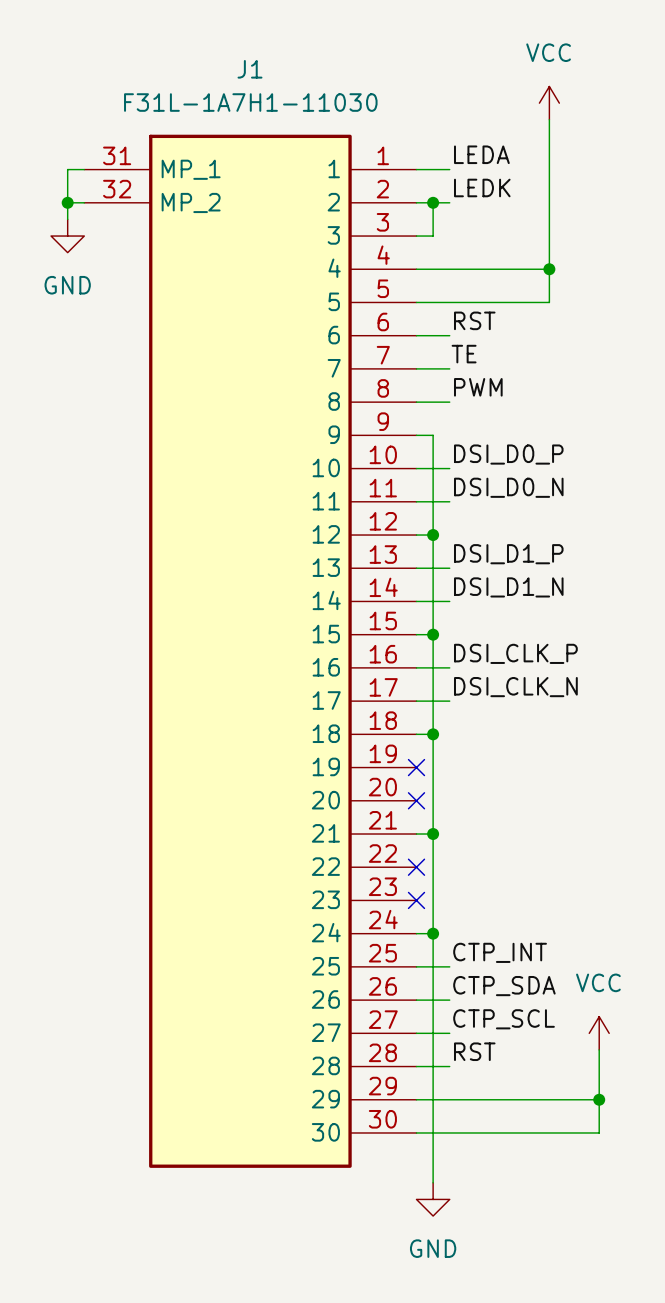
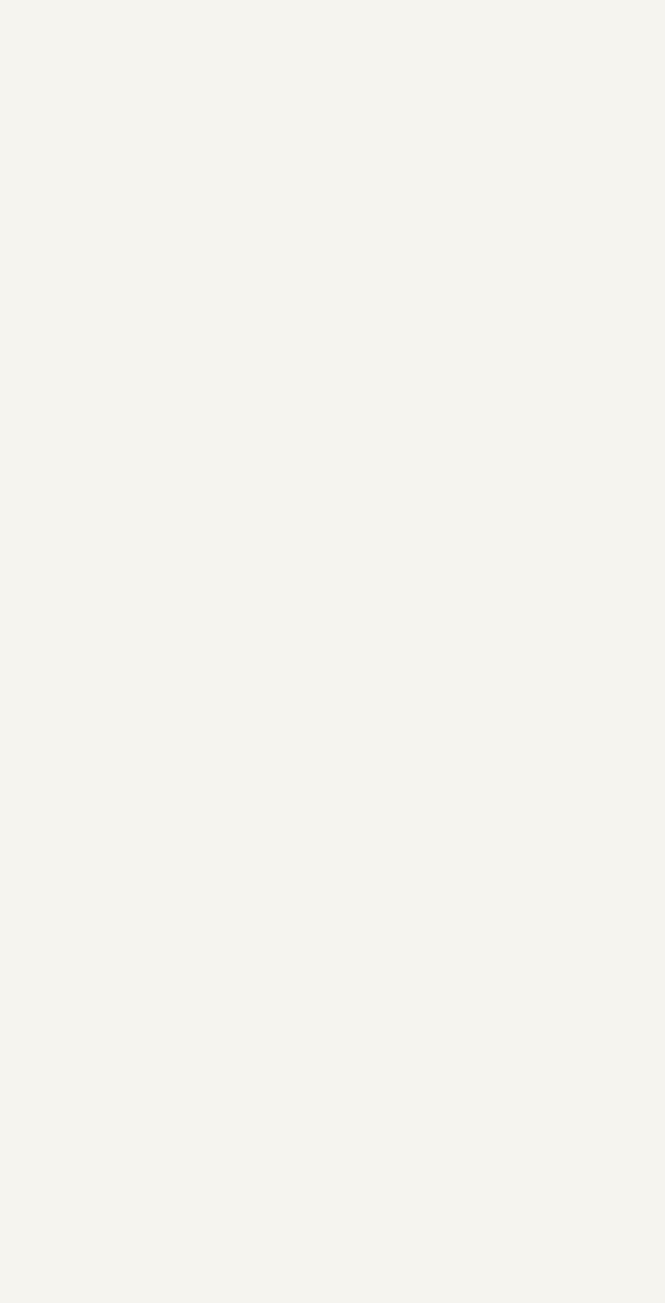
power symbol: VCC (549, 103) -> none
wire: (549, 119) (549, 302) (416, 302) -> none
label: LEDA (481, 154) -> none
wire: (84, 169) (67, 169) (67, 219) -> none
wire: (416, 169) (449, 169) -> none
label: LEDK (482, 187) -> none
wire: (67, 202) (84, 202) -> none
junction: (67, 202) -> none
wire: (416, 202) (449, 202) -> none
wire: (433, 202) (433, 236) (416, 236) -> none
junction: (433, 202) -> none
power symbol: GND (67, 236) -> none
wire: (416, 269) (549, 269) -> none
junction: (549, 269) -> none
label: RST (474, 320) -> none
wire: (416, 335) (449, 335) -> none
label: TE (464, 354) -> none
wire: (416, 368) (449, 368) -> none
label: PWM (478, 387) -> none
wire: (416, 402) (449, 402) -> none
wire: (416, 435) (433, 435) (433, 1182) -> none
label: DSI_D0_P (508, 454) -> none
wire: (416, 468) (449, 468) -> none
label: DSI_D0_N (508, 487) -> none
wire: (416, 501) (449, 501) -> none
wire: (416, 535) (433, 535) -> none
junction: (433, 535) -> none
label: DSI_D1_P (508, 554) -> none
wire: (416, 568) (449, 568) -> none
label: DSI_D1_N (508, 587) -> none
wire: (416, 601) (449, 601) -> none
wire: (416, 634) (433, 634) -> none
junction: (433, 634) -> none
J1: F31L-1A7H1-11030 (250, 651) -> none
label: DSI_CLK_P (515, 653) -> none
wire: (416, 667) (449, 667) -> none
label: DSI_CLK_N (515, 687) -> none
wire: (416, 701) (449, 701) -> none
wire: (416, 734) (433, 734) -> none
junction: (433, 734) -> none
no-connect mark: (416, 767) -> none
no-connect mark: (416, 800) -> none
wire: (416, 834) (433, 834) -> none
junction: (433, 834) -> none
no-connect mark: (416, 867) -> none
no-connect mark: (416, 900) -> none
wire: (416, 933) (433, 933) -> none
junction: (433, 933) -> none
label: CTP_INT (500, 952) -> none
wire: (416, 966) (449, 966) -> none
label: CTP_SDA (504, 986) -> none
wire: (416, 1000) (449, 1000) -> none
label: CTP_SCL (504, 1019) -> none
wire: (416, 1033) (449, 1033) -> none
power symbol: VCC (599, 1033) -> none
wire: (599, 1049) (599, 1132) (416, 1132) -> none
label: RST (474, 1051) -> none
wire: (416, 1066) (449, 1066) -> none
wire: (416, 1099) (599, 1099) -> none
junction: (599, 1099) -> none
power symbol: GND (433, 1199) -> none

